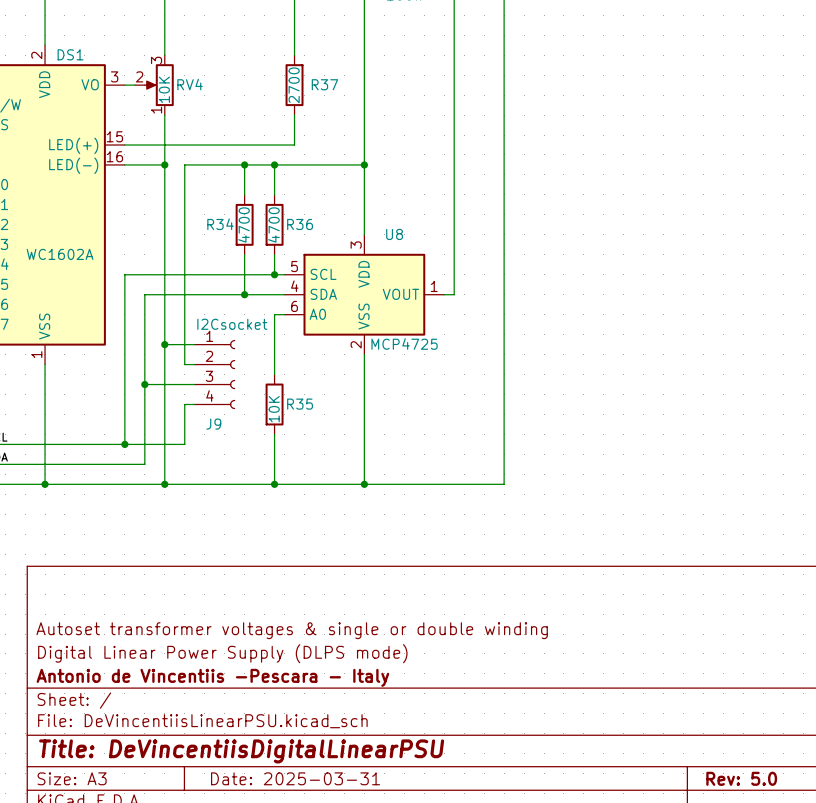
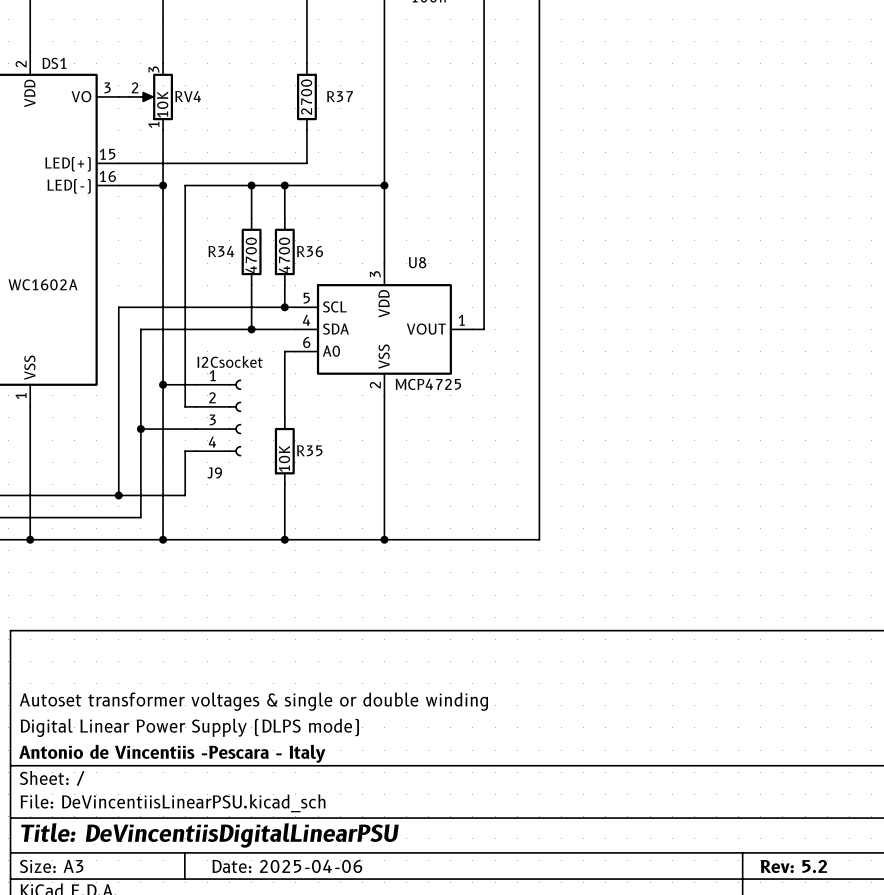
title block: Date: 2025-03-31 (295, 778) -> Date: 2025-04-06 (287, 866)
title block: Rev: 5.0 (741, 778) -> Rev: 5.2 (793, 866)

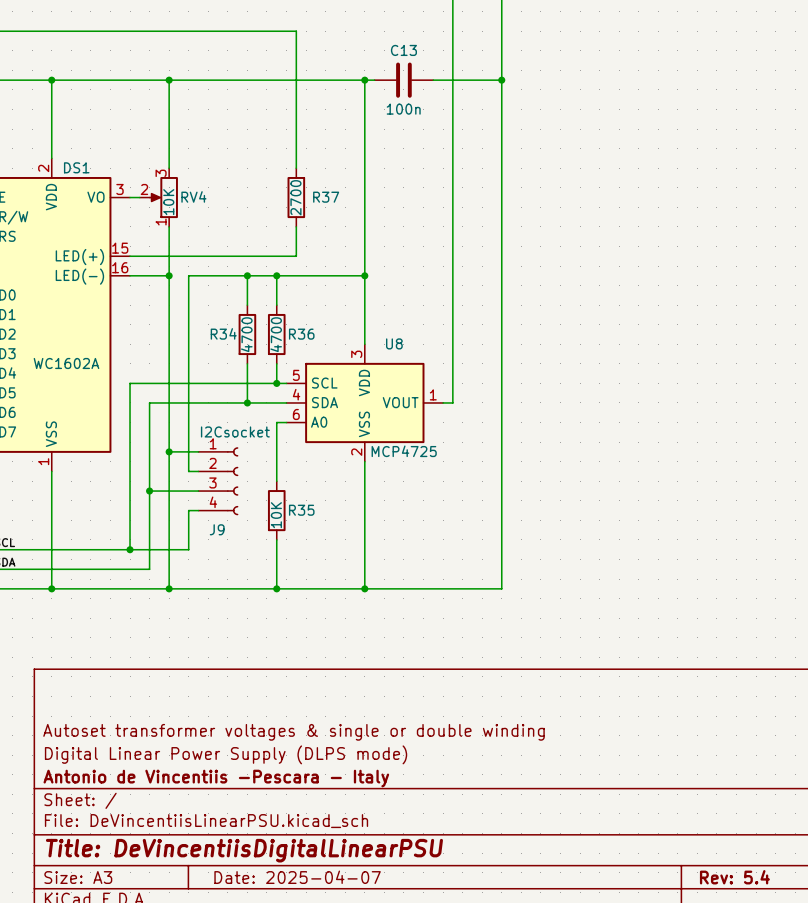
title block: Date: 2025-04-06 (287, 866) -> Date: 2025-04-07 (297, 877)
title block: Rev: 5.2 (793, 866) -> Rev: 5.4 (734, 877)

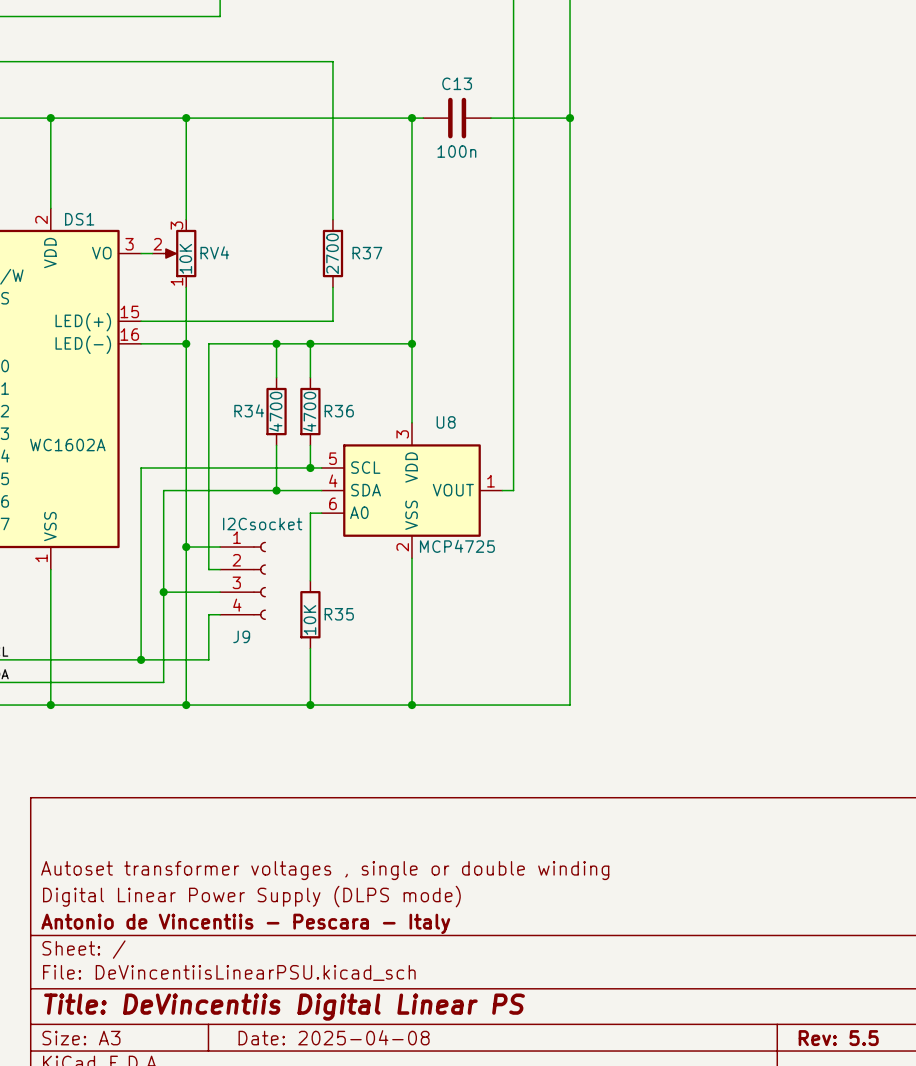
title block: Autoset transformer voltages & single or double winding (293, 732) -> Autoset transformer voltages , single or double winding (325, 870)
title block: Antonio de Vincentiis -Pescara - Italy (216, 778) -> Antonio de Vincentiis - Pescara - Italy (245, 923)
title block: Title: DeVincentiisDigitalLinearPSU (244, 850) -> Title: DeVincentiis Digital Linear PS (284, 1007)
title block: Date: 2025-04-07 (297, 877) -> Date: 2025-04-08 (334, 1037)
title block: Rev: 5.4 (734, 877) -> Rev: 5.5 (838, 1038)

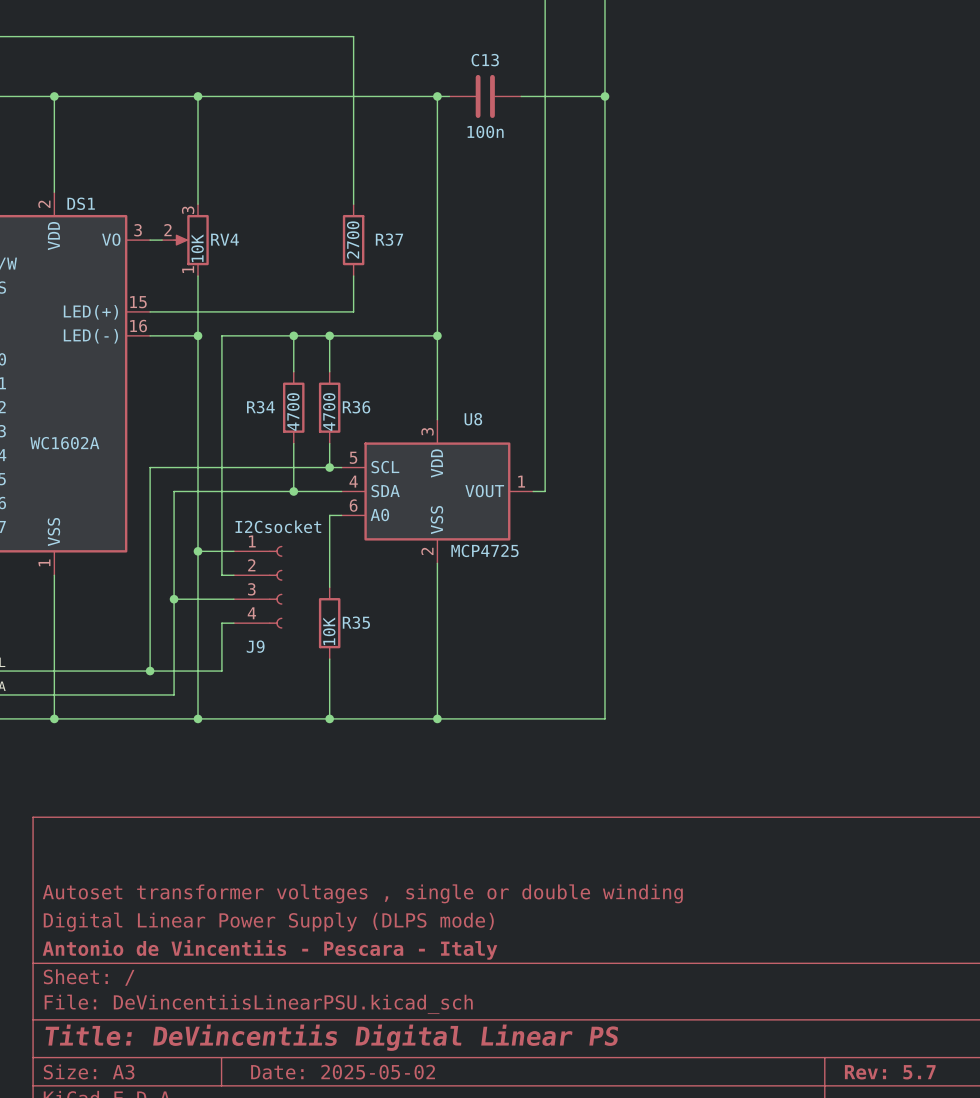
title block: Date: 2025-04-08 (334, 1037) -> Date: 2025-05-02 (343, 1072)
title block: Rev: 5.5 (838, 1038) -> Rev: 5.7 (890, 1072)

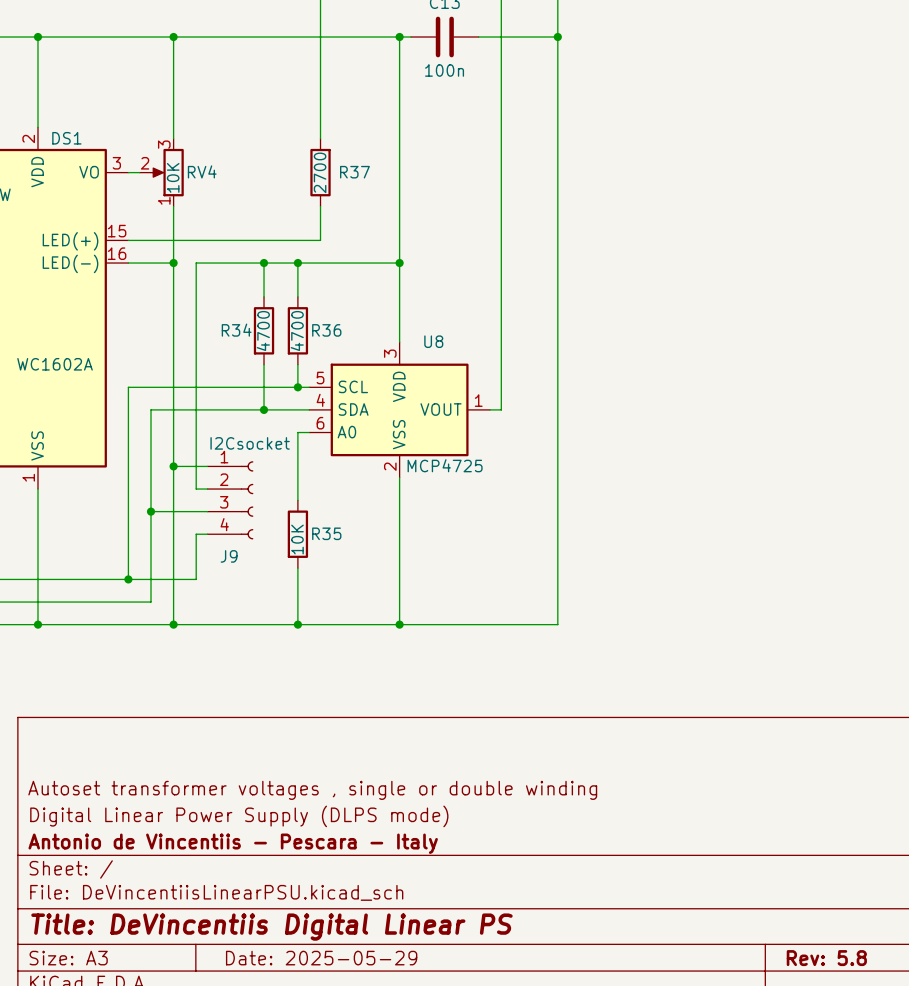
title block: Date: 2025-05-02 (343, 1072) -> Date: 2025-05-29 (321, 958)
title block: Rev: 5.7 (890, 1072) -> Rev: 5.8 (826, 958)

